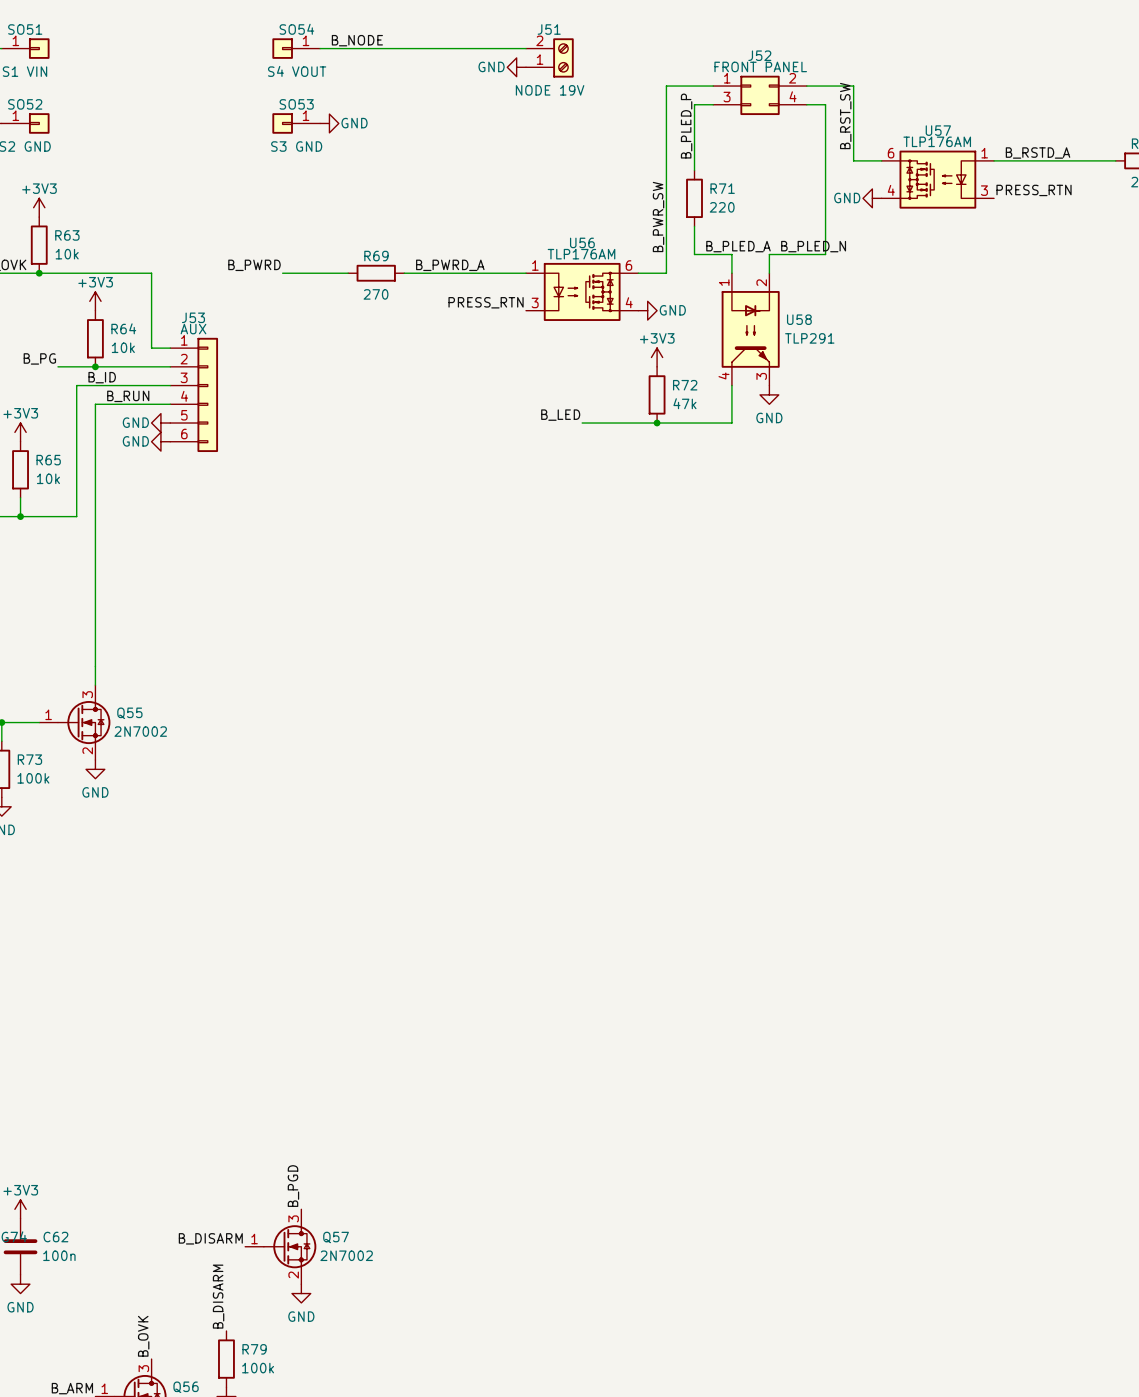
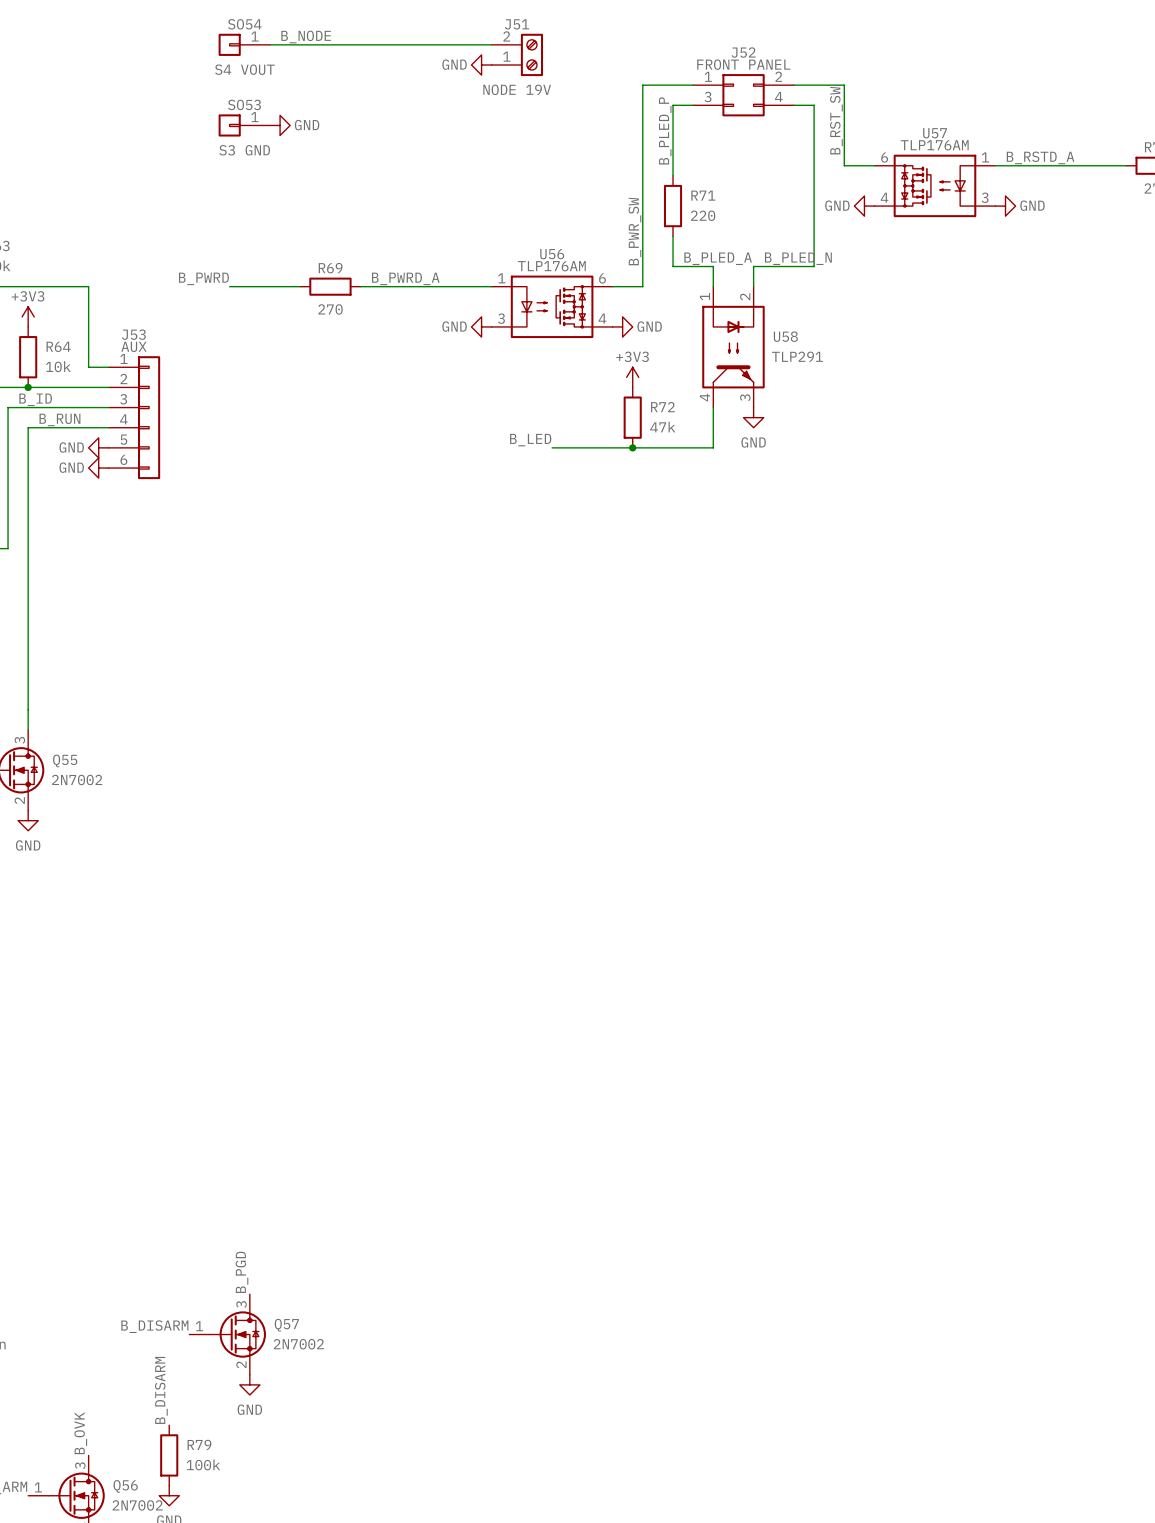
label: PRESS_RTN (1034, 190) -> none
power symbol: none -> GND (1005, 206)
label: PRESS_RTN (486, 302) -> none
power symbol: none -> GND (481, 326)

